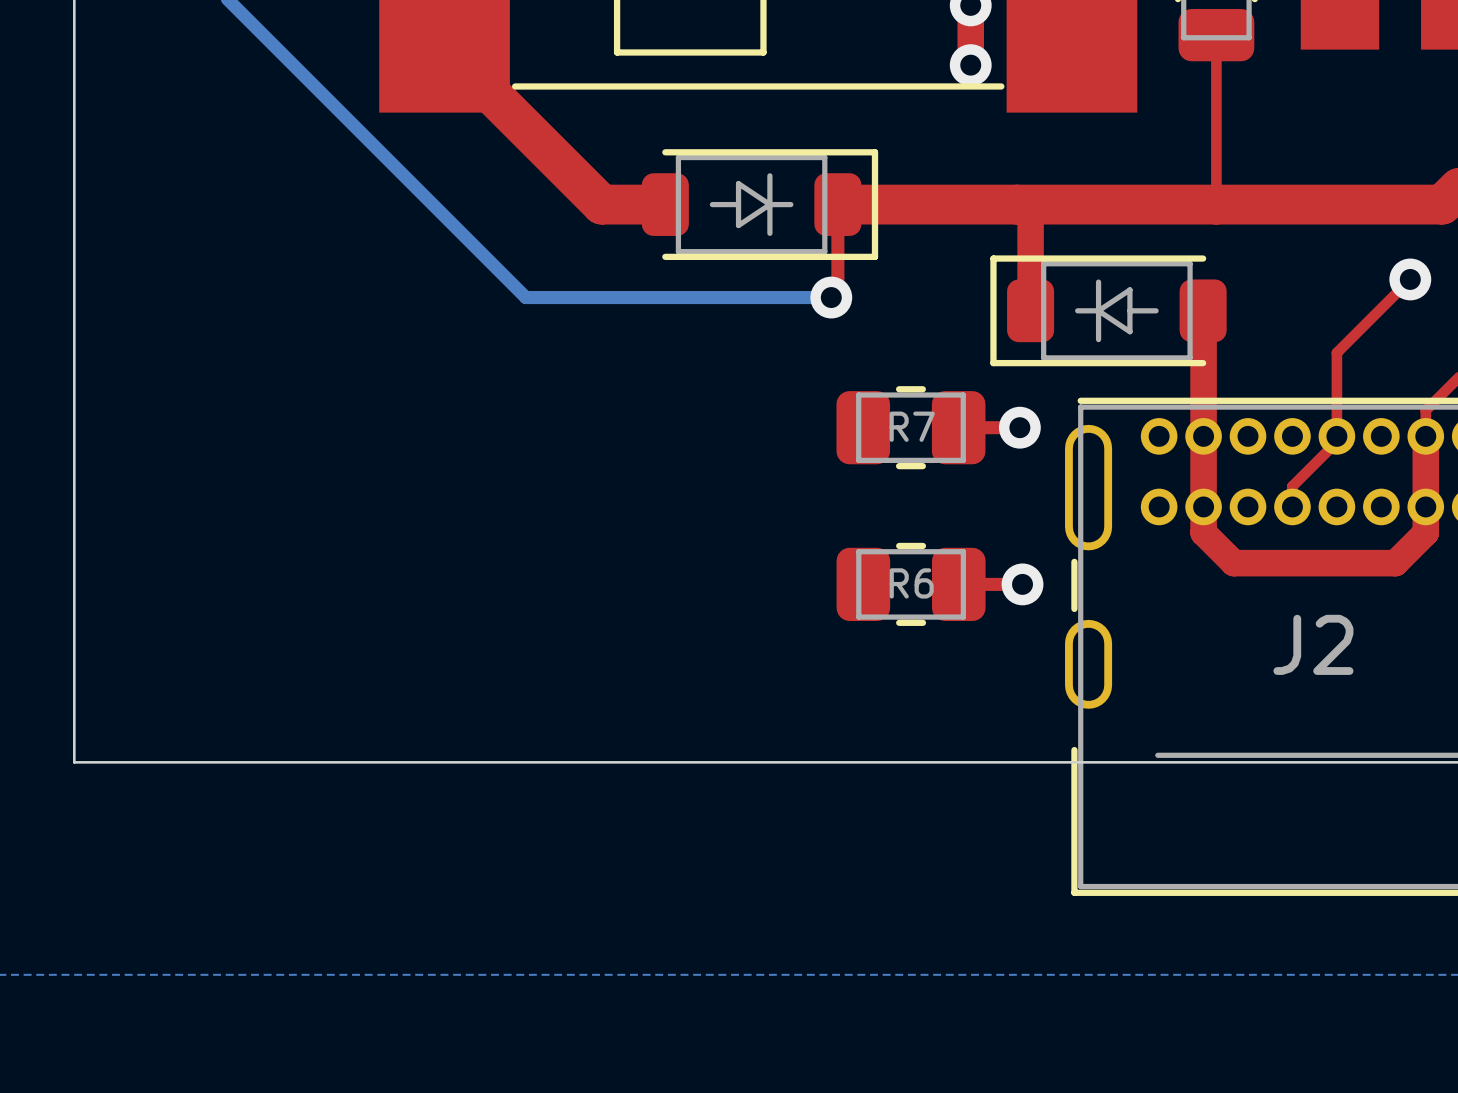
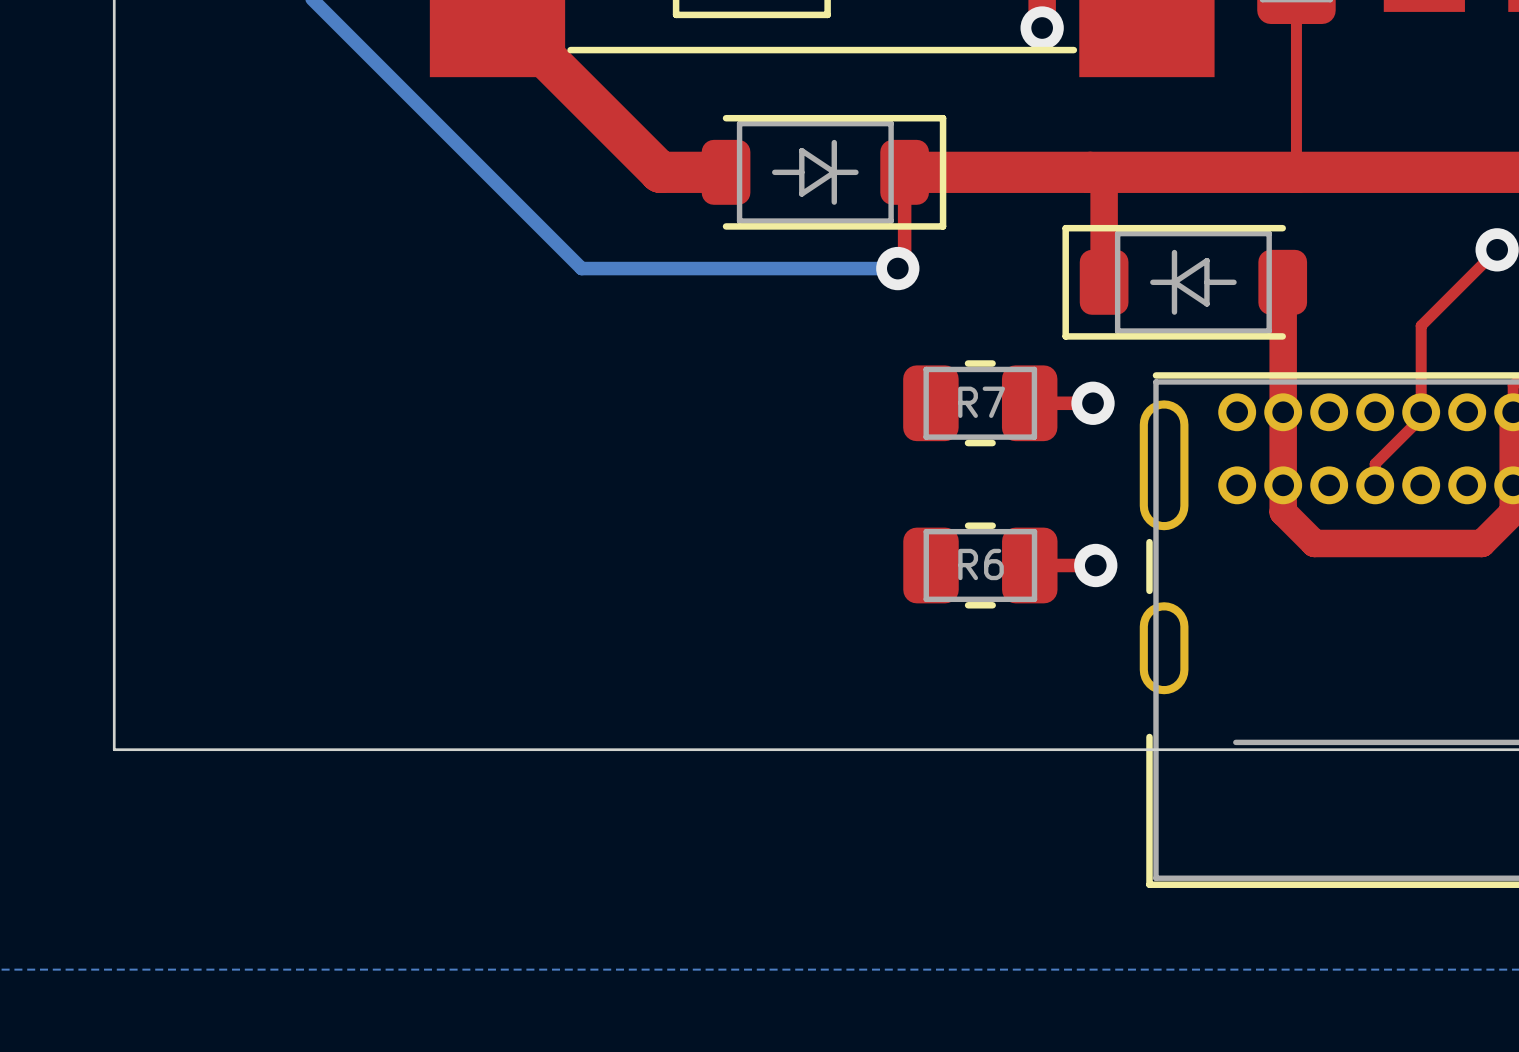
J2 name: J2 (1313, 644) -> none

